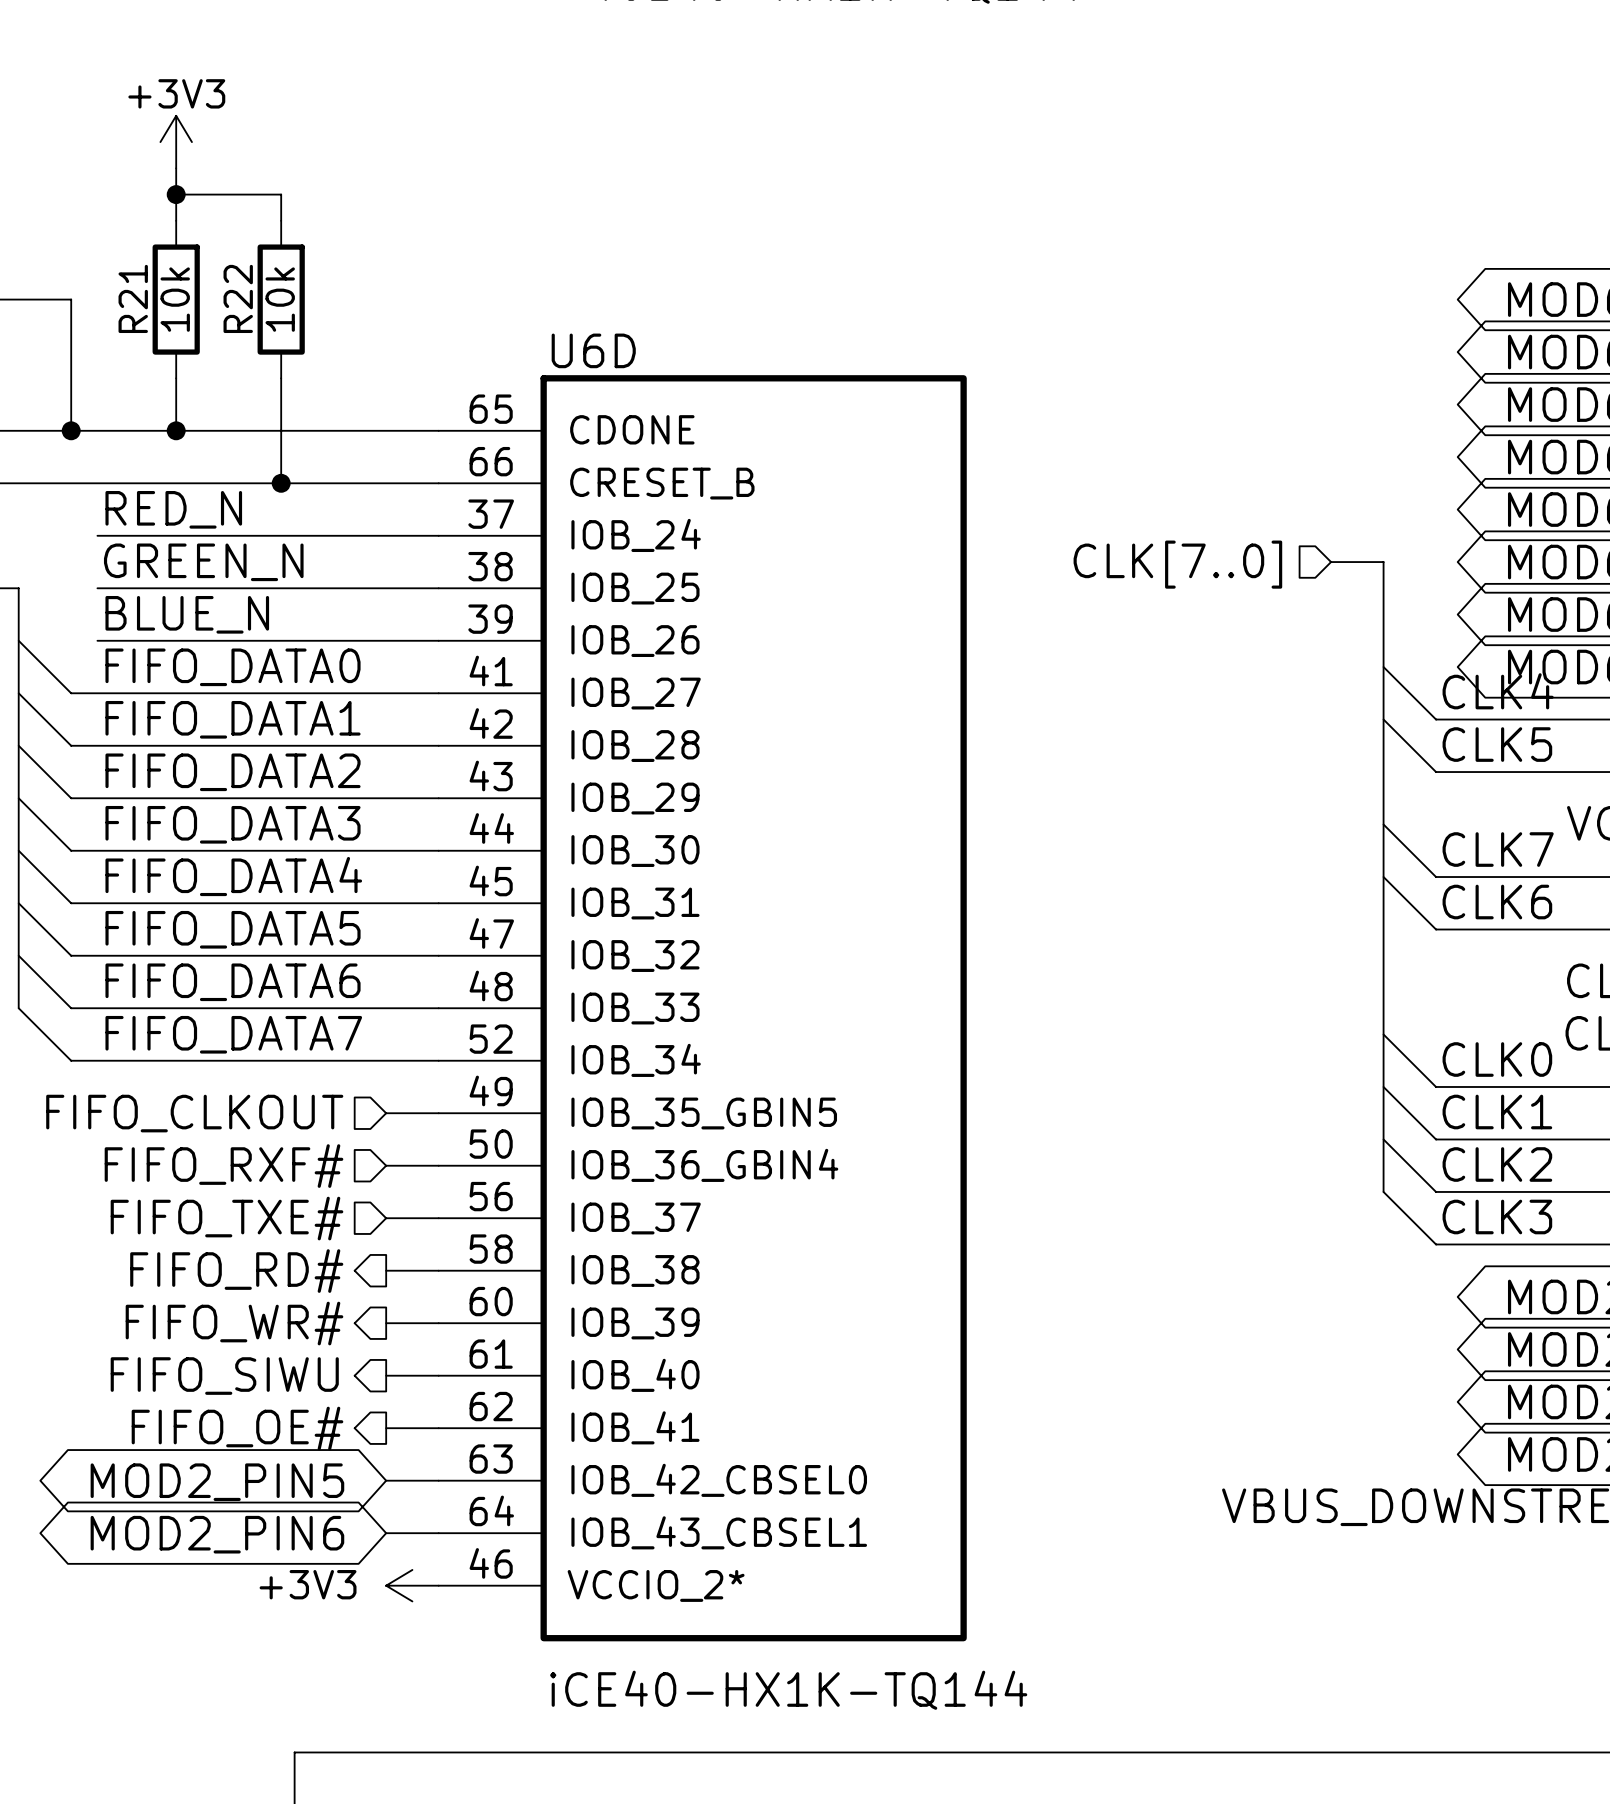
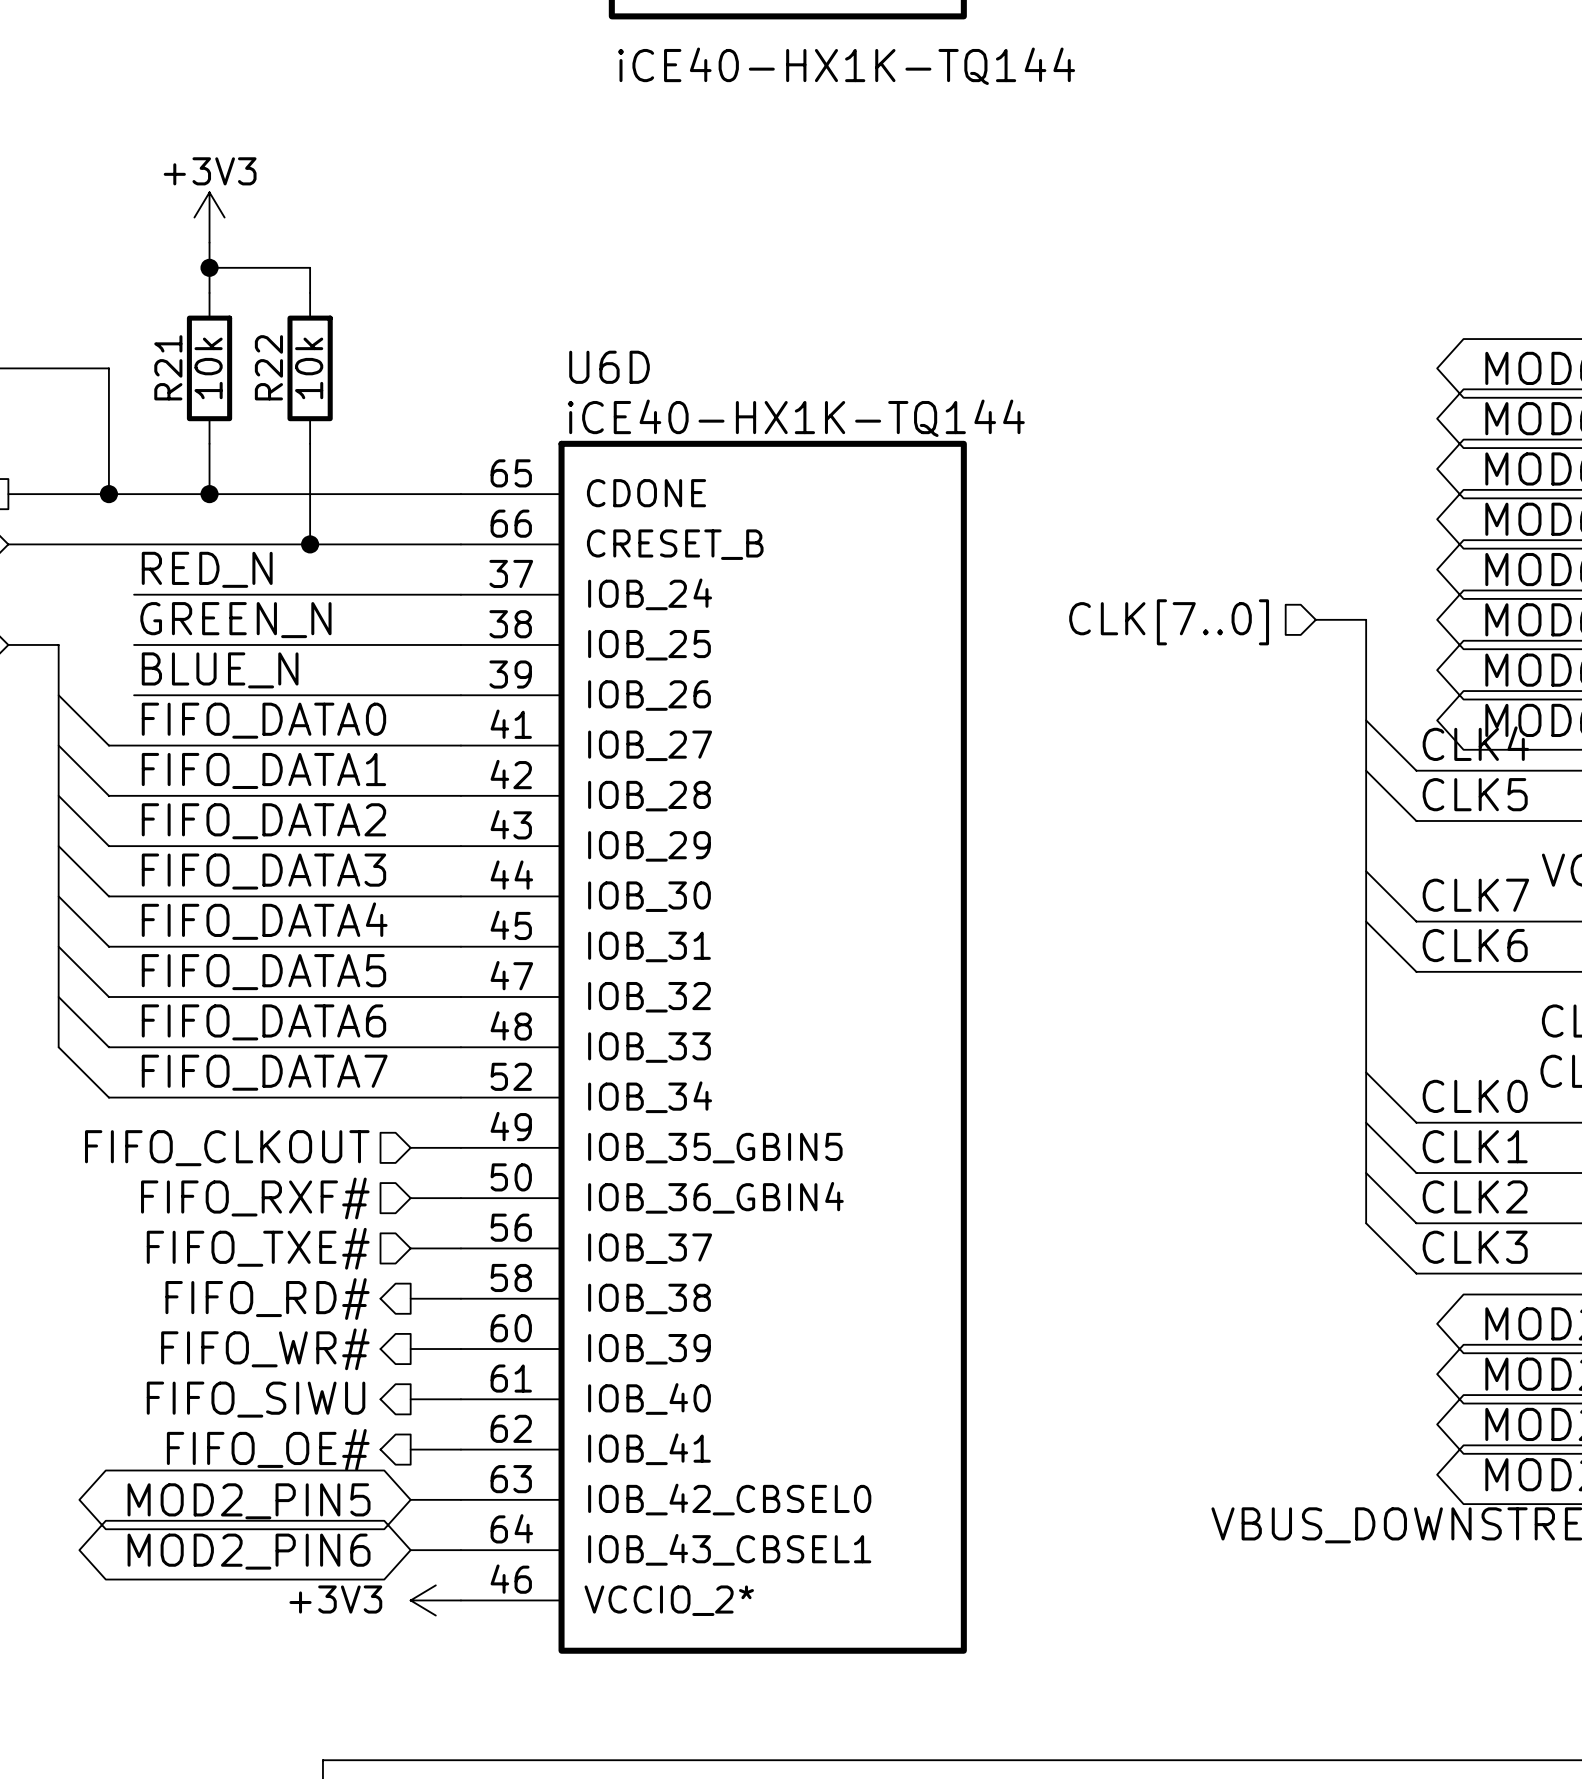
U6D name position: U6D (593, 350) -> U6D (609, 367)
U6D value position: iCE40-HX1K-TQ144 (788, 1690) -> iCE40-HX1K-TQ144 (796, 418)

